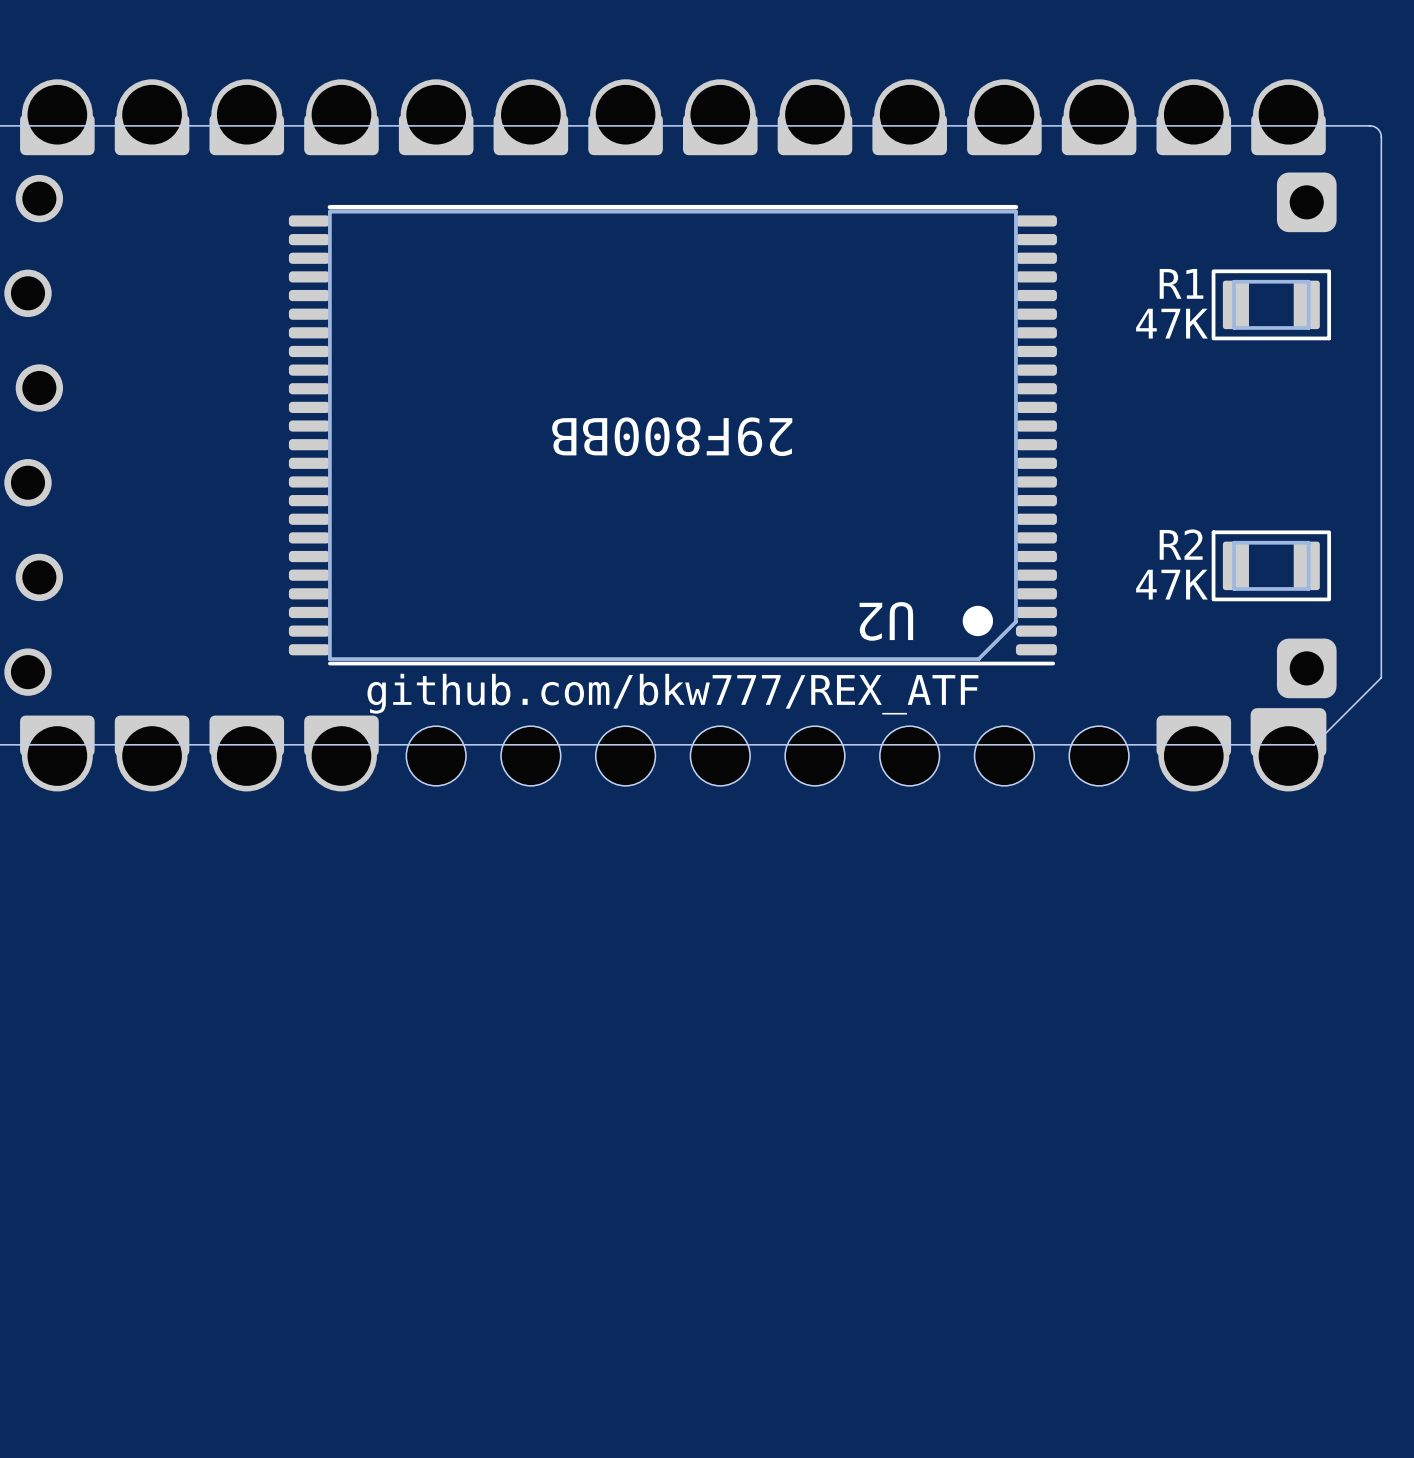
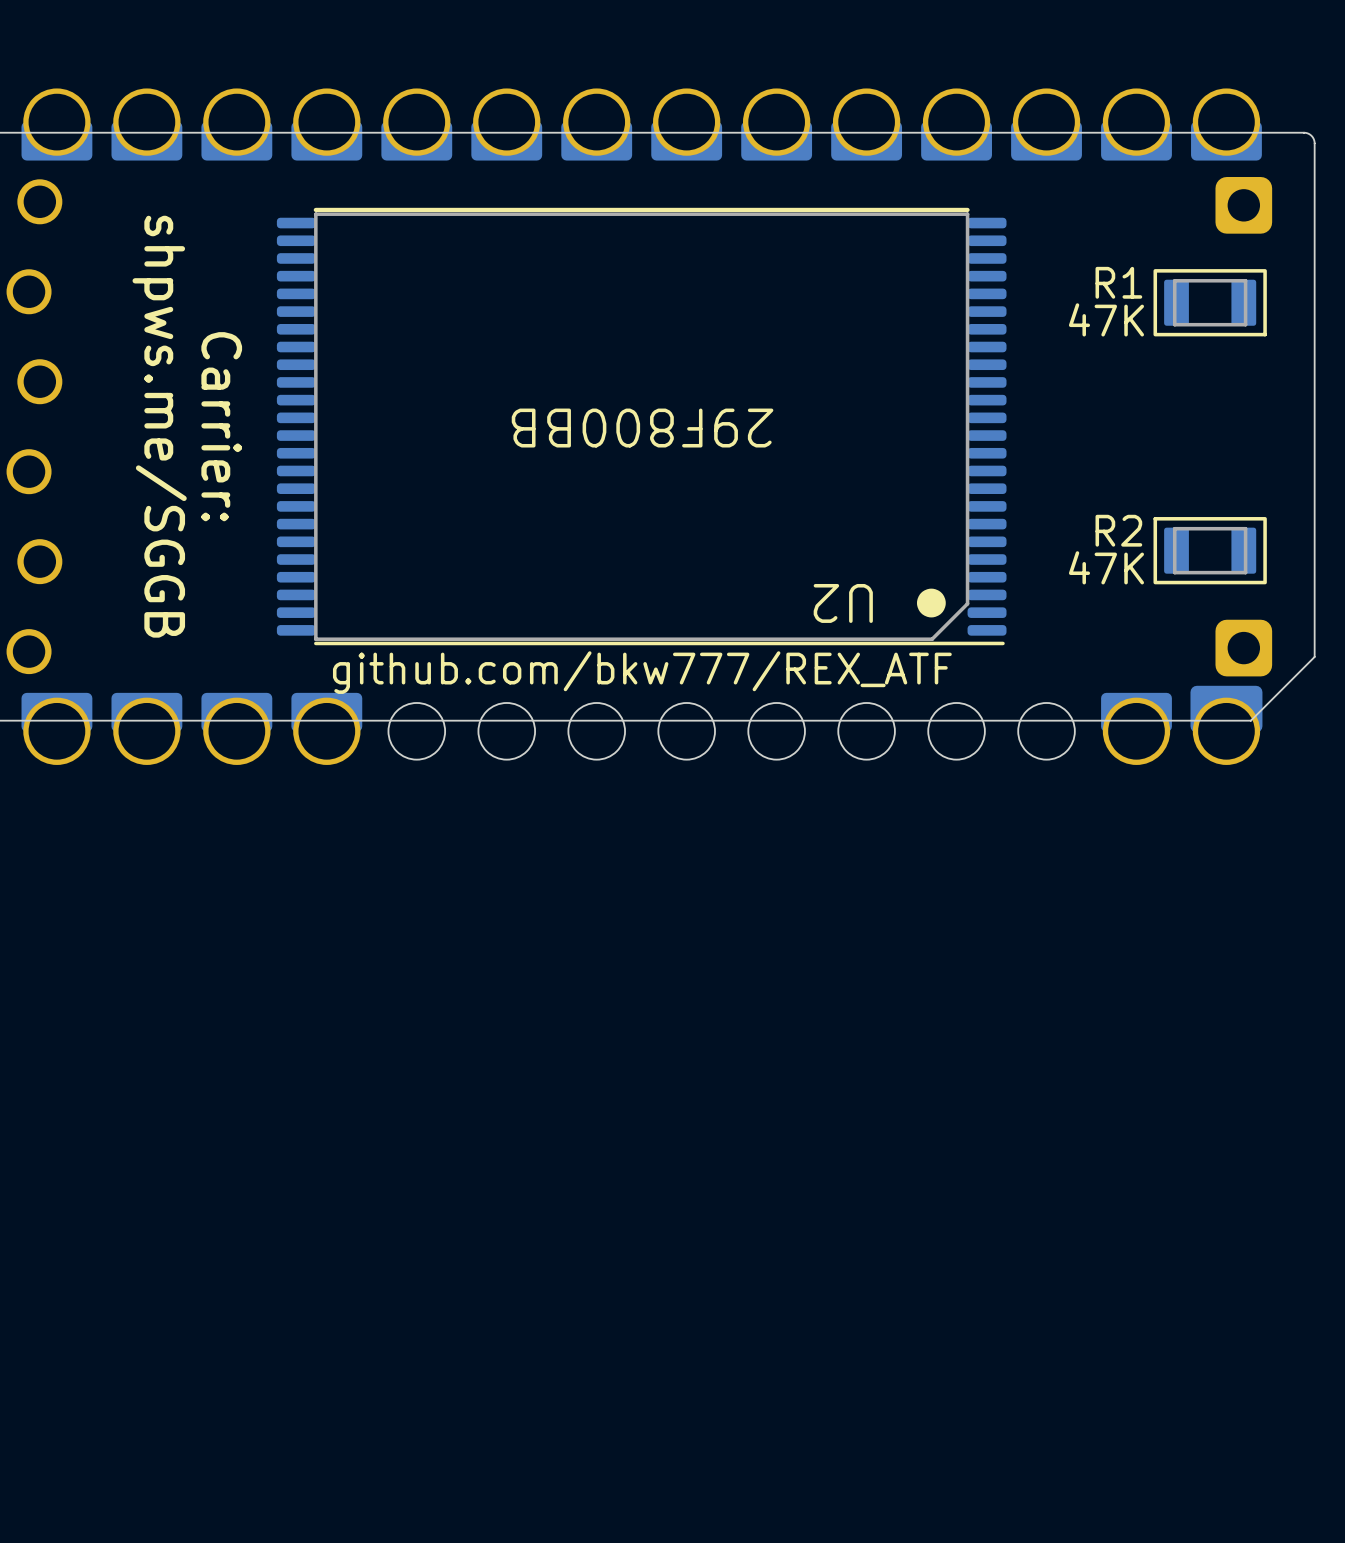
text: none -> Carrier: (221, 426)
text: none -> shpws.me/SGGB (159, 426)

